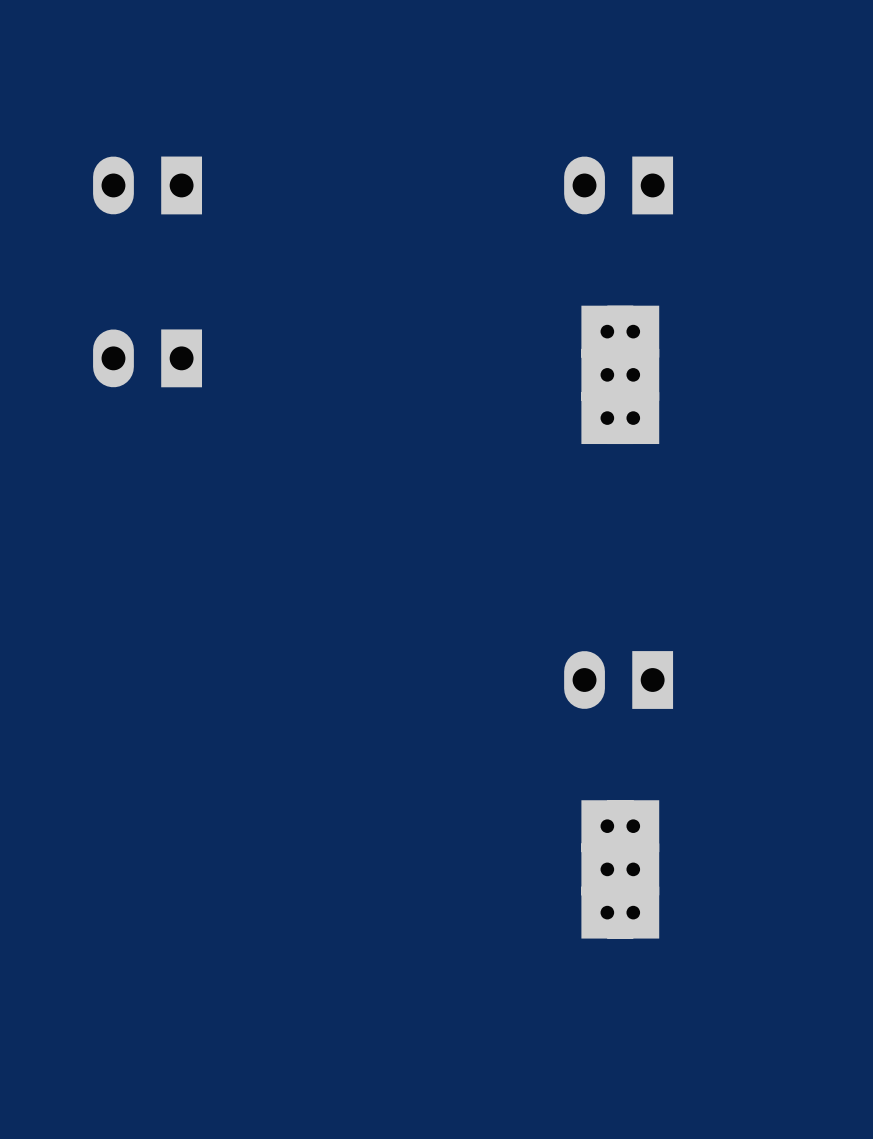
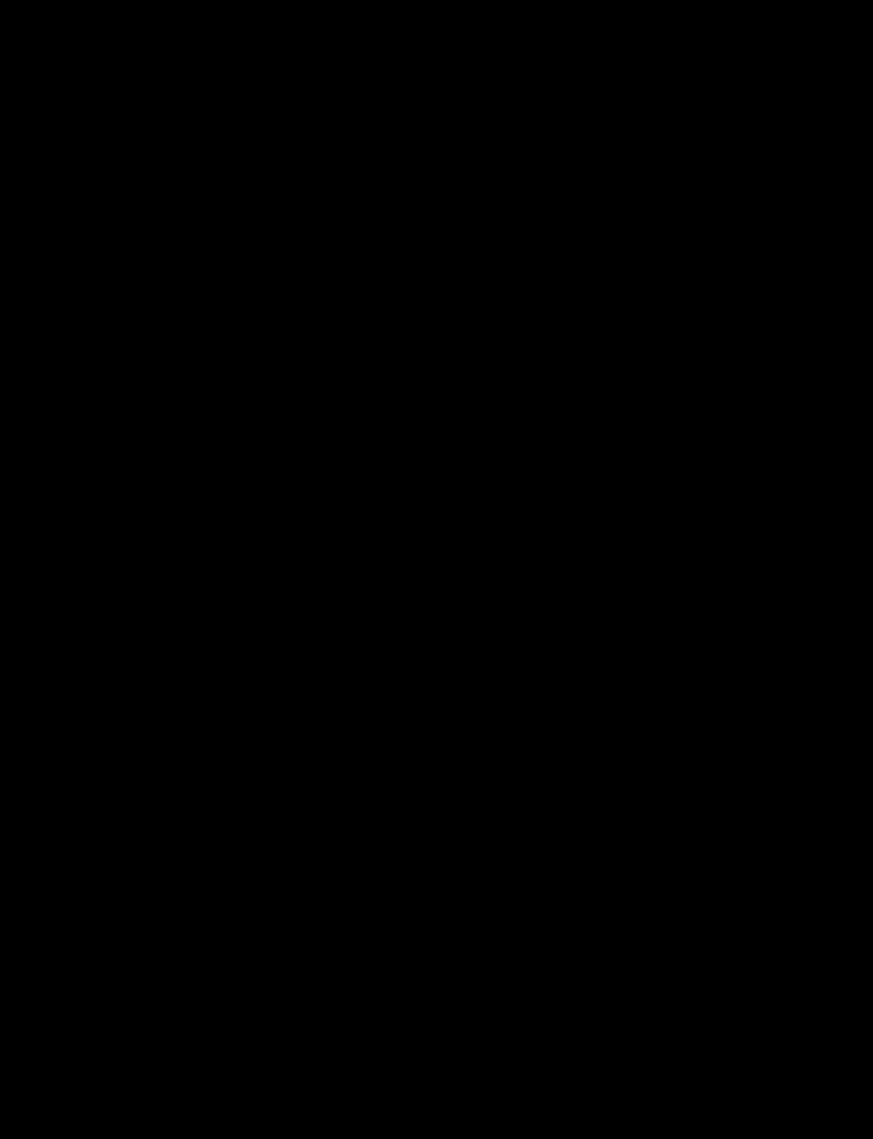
part: (147, 185) -> none
part: (618, 185) -> none
part: (147, 358) -> none
part: (620, 374) -> none
part: (618, 680) -> none
part: (620, 869) -> none

